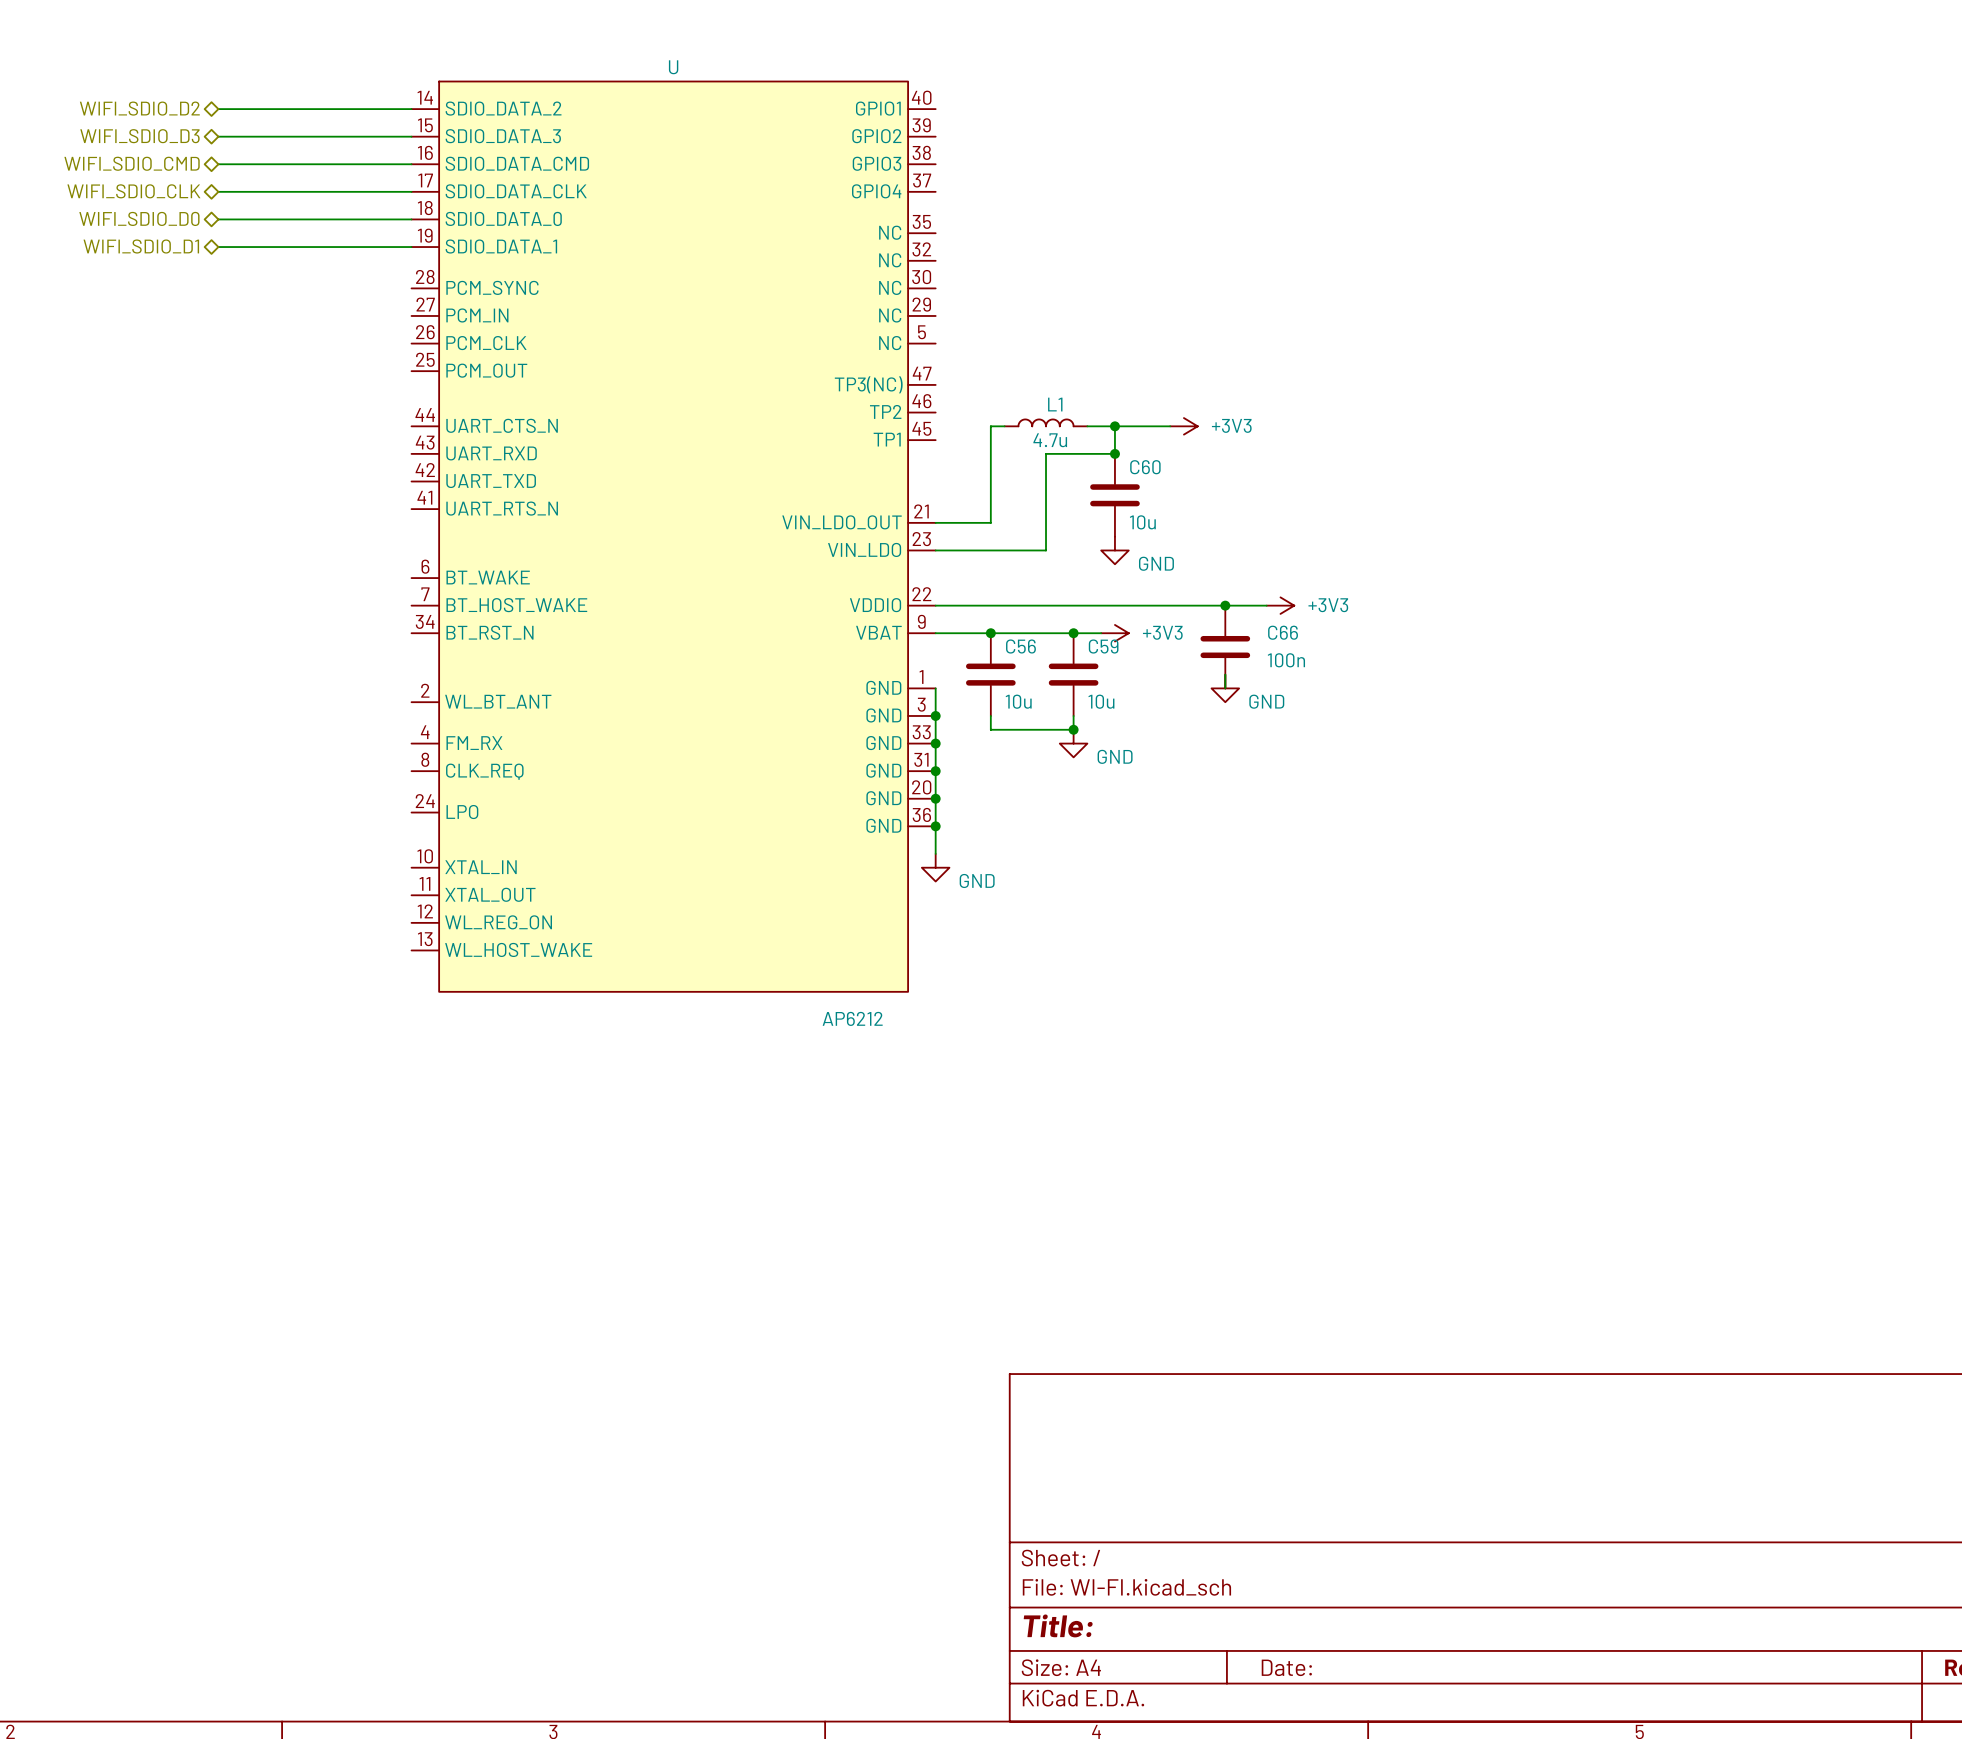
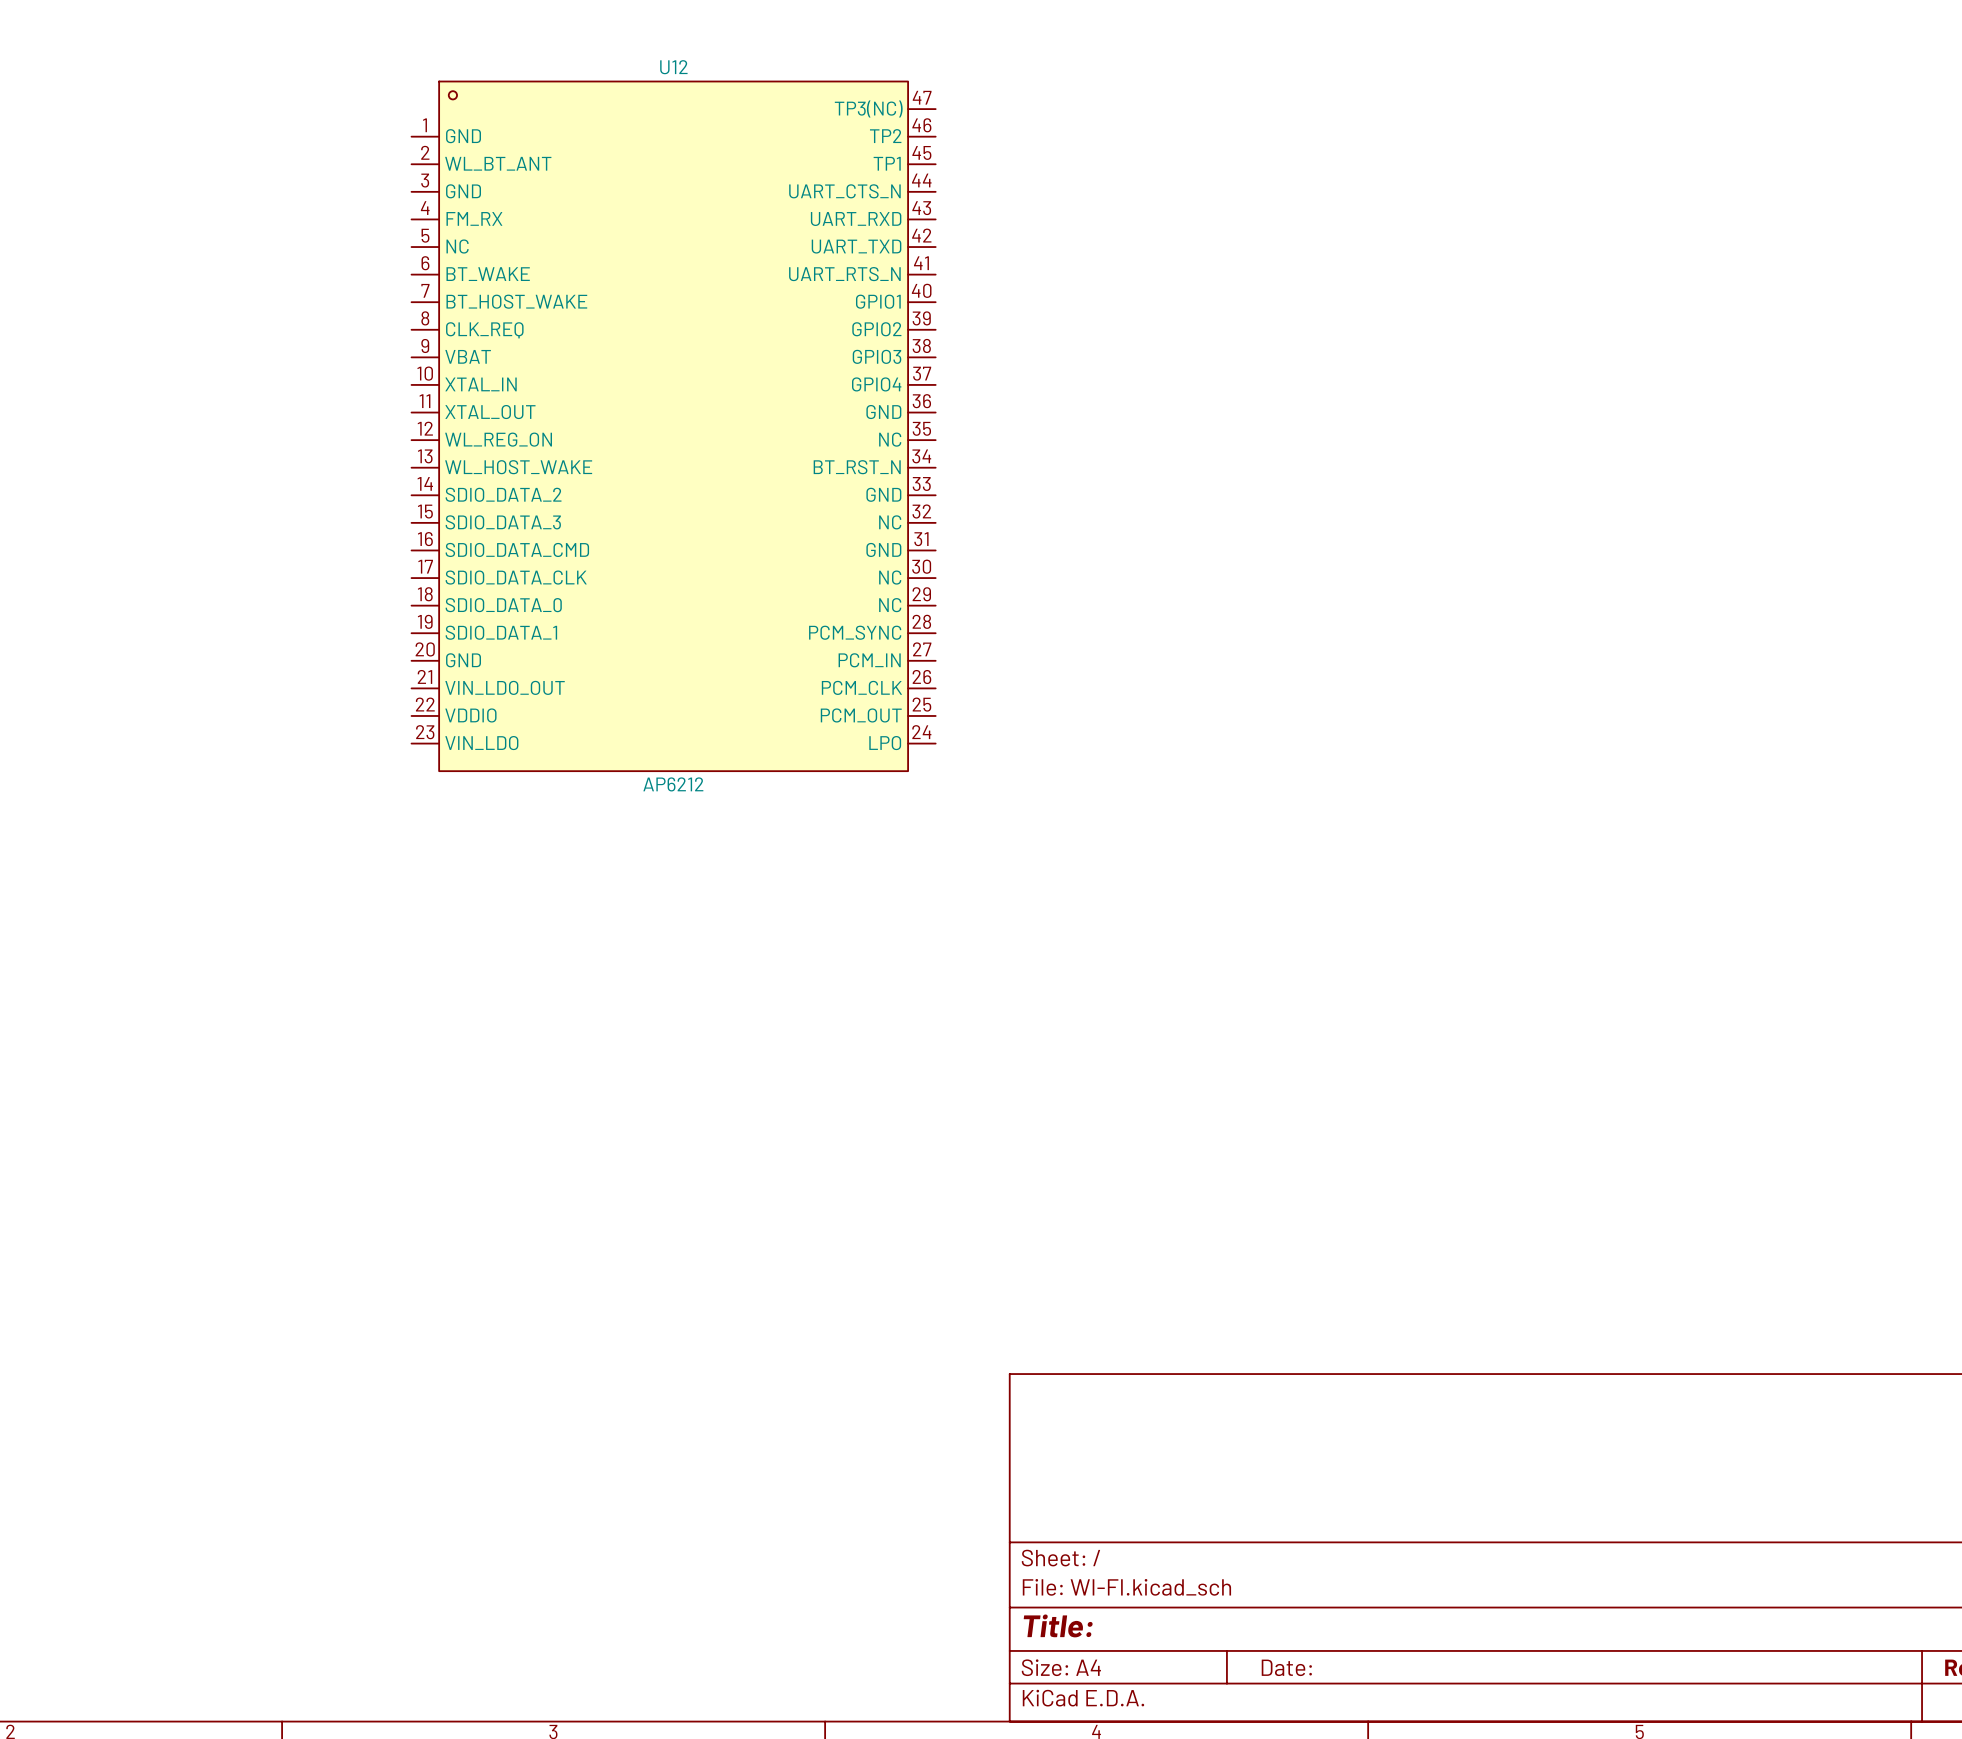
hierarchical label: WIFI_SDIO_D2 (139, 108) -> none
wire: (218, 109) (411, 109) -> none
hierarchical label: WIFI_SDIO_D3 (139, 136) -> none
wire: (218, 136) (411, 136) -> none
hierarchical label: WIFI_SDIO_CMD (132, 163) -> none
wire: (218, 164) (411, 164) -> none
hierarchical label: WIFI_SDIO_CLK (133, 191) -> none
wire: (218, 191) (411, 191) -> none
hierarchical label: WIFI_SDIO_D0 (139, 218) -> none
wire: (218, 219) (411, 219) -> none
hierarchical label: WIFI_SDIO_D1 (141, 246) -> none
wire: (218, 247) (411, 247) -> none
L1: 4.7u (1046, 422) -> none
U12: none -> AP6212 (673, 426)
wire: (1004, 426) (990, 426) (990, 522) (935, 522) -> none
wire: (1087, 426) (1170, 426) -> none
wire: (1114, 426) (1114, 453) (1046, 453) (1046, 550) (935, 550) -> none
junction: (1114, 426) -> none
power symbol: +3V3 (1183, 426) -> none
junction: (1114, 453) -> none
C60: 10u (1114, 495) -> none
U: AP6212 (673, 536) -> none
power symbol: GND (1114, 550) -> none
wire: (935, 605) (1266, 605) -> none
junction: (1225, 605) -> none
power symbol: +3V3 (1280, 605) -> none
wire: (935, 633) (1101, 633) -> none
junction: (990, 633) -> none
junction: (1073, 633) -> none
power symbol: +3V3 (1114, 633) -> none
C66: 100n (1225, 647) -> none
C56: 10u (990, 674) -> none
C59: 10u (1073, 674) -> none
wire: (1225, 674) (1225, 688) -> none
wire: (935, 688) (935, 853) -> none
power symbol: GND (1225, 688) -> none
junction: (935, 715) -> none
wire: (990, 715) (990, 729) (1073, 729) (1073, 715) -> none
junction: (1073, 729) -> none
junction: (935, 743) -> none
power symbol: GND (1073, 743) -> none
junction: (935, 771) -> none
junction: (935, 798) -> none
junction: (935, 826) -> none
power symbol: GND (935, 867) -> none

